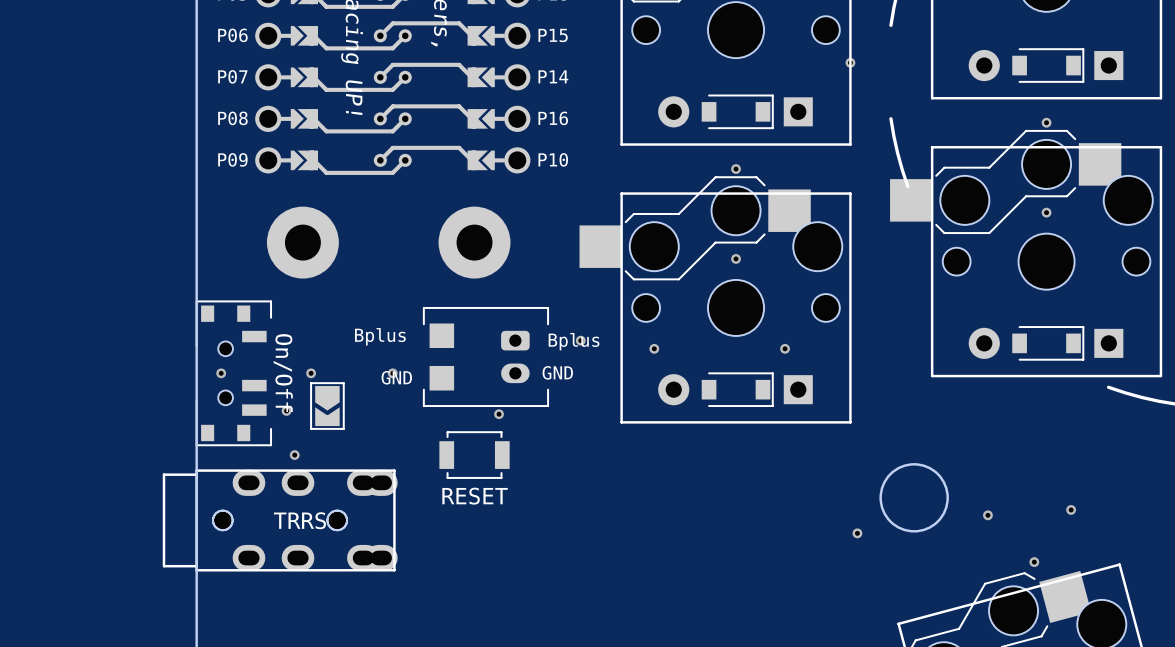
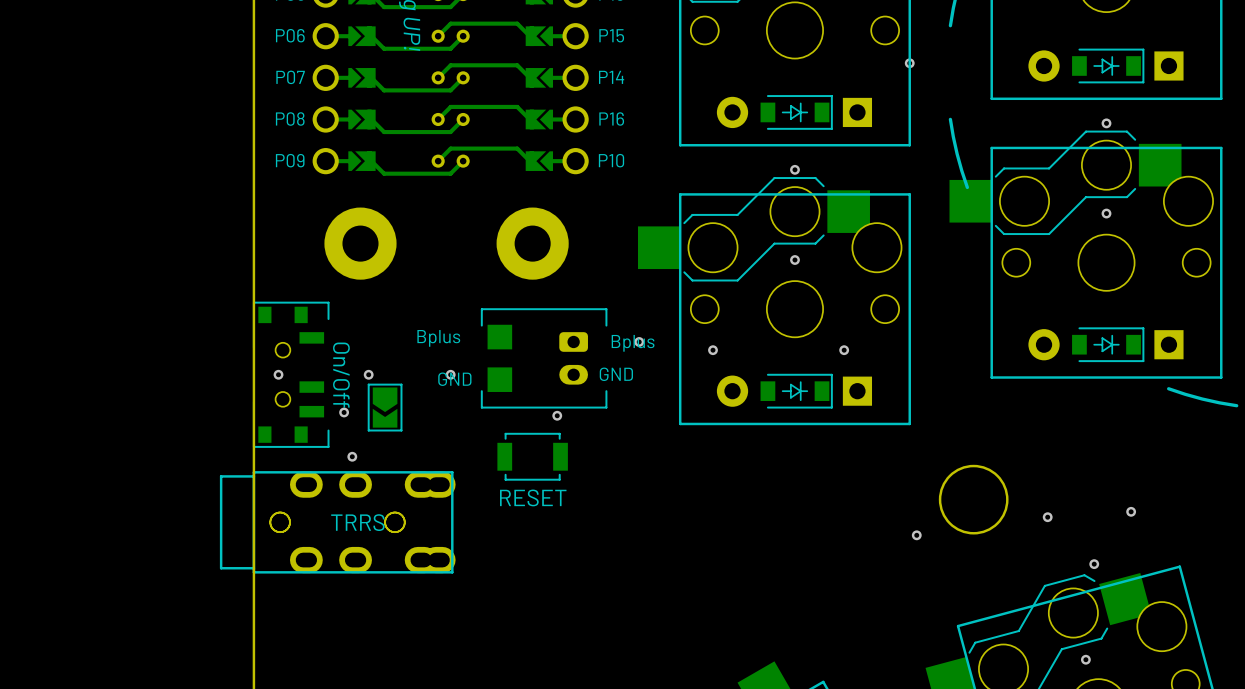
part footprint: [968, 48, 1124, 83] -> [1028, 48, 1184, 84]
part footprint: [658, 94, 813, 130] -> [716, 95, 873, 130]
part footprint: [968, 326, 1124, 361] -> [1028, 327, 1184, 363]
part footprint: [658, 372, 813, 408] -> [716, 373, 873, 409]

